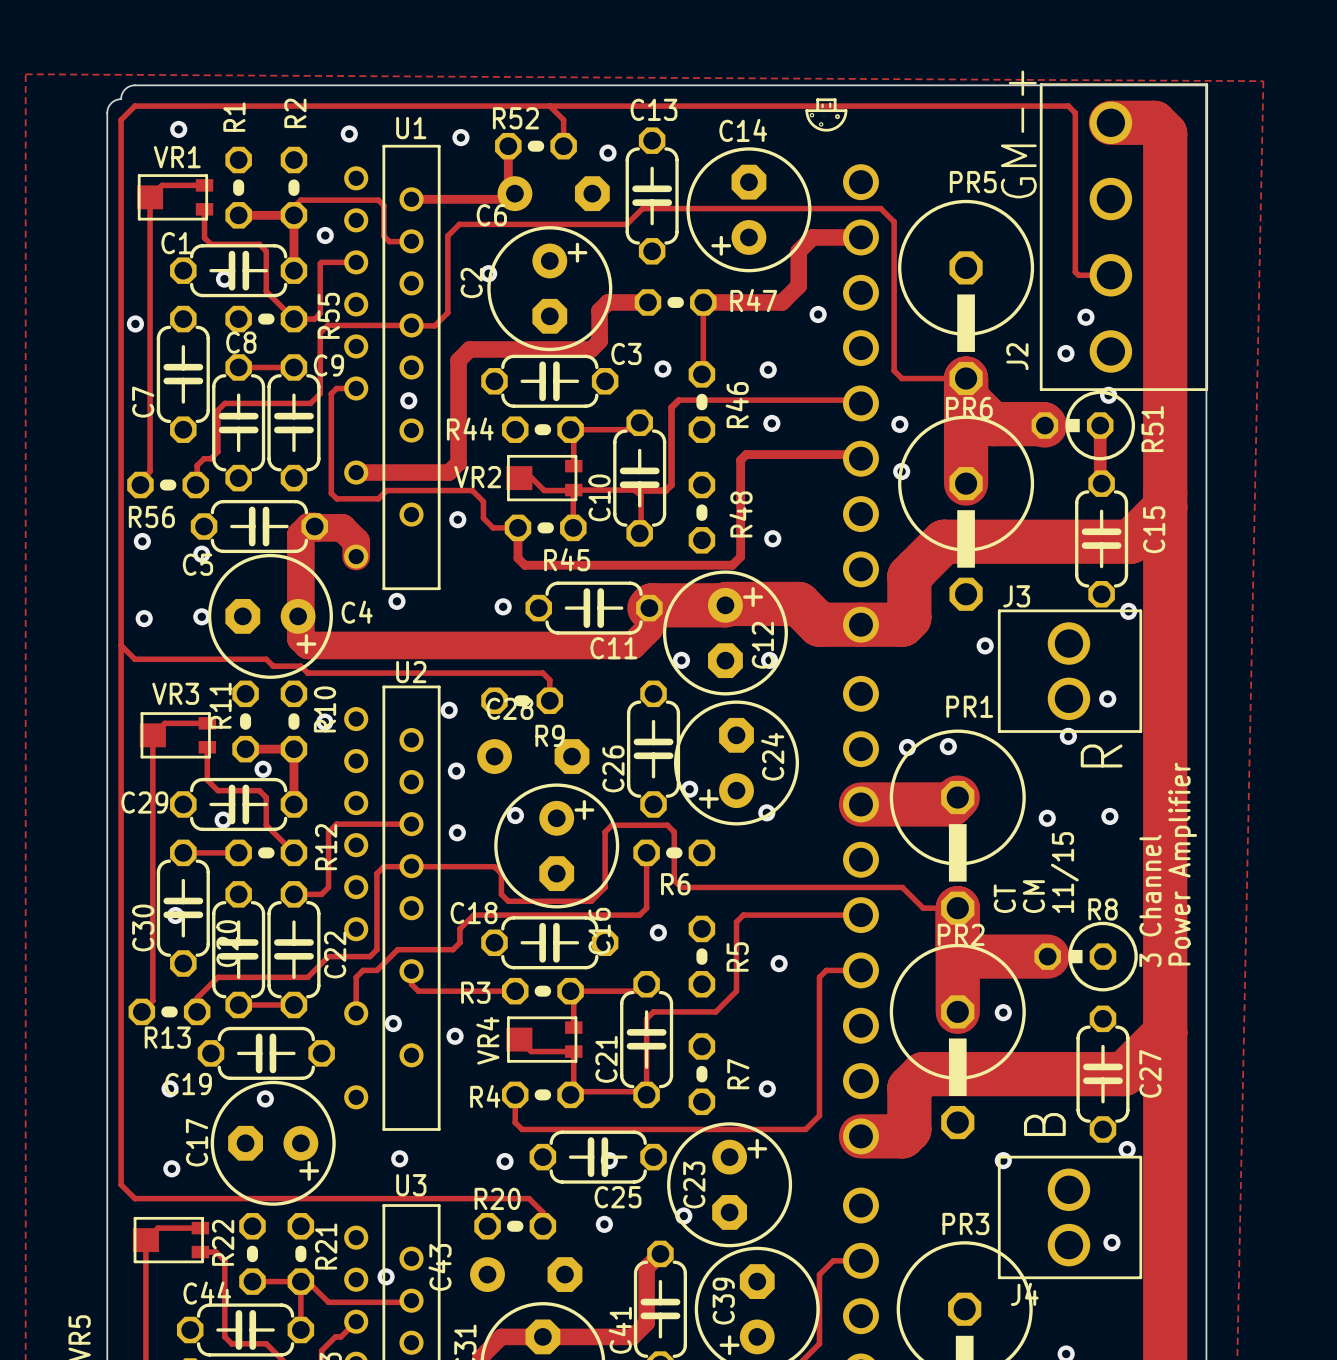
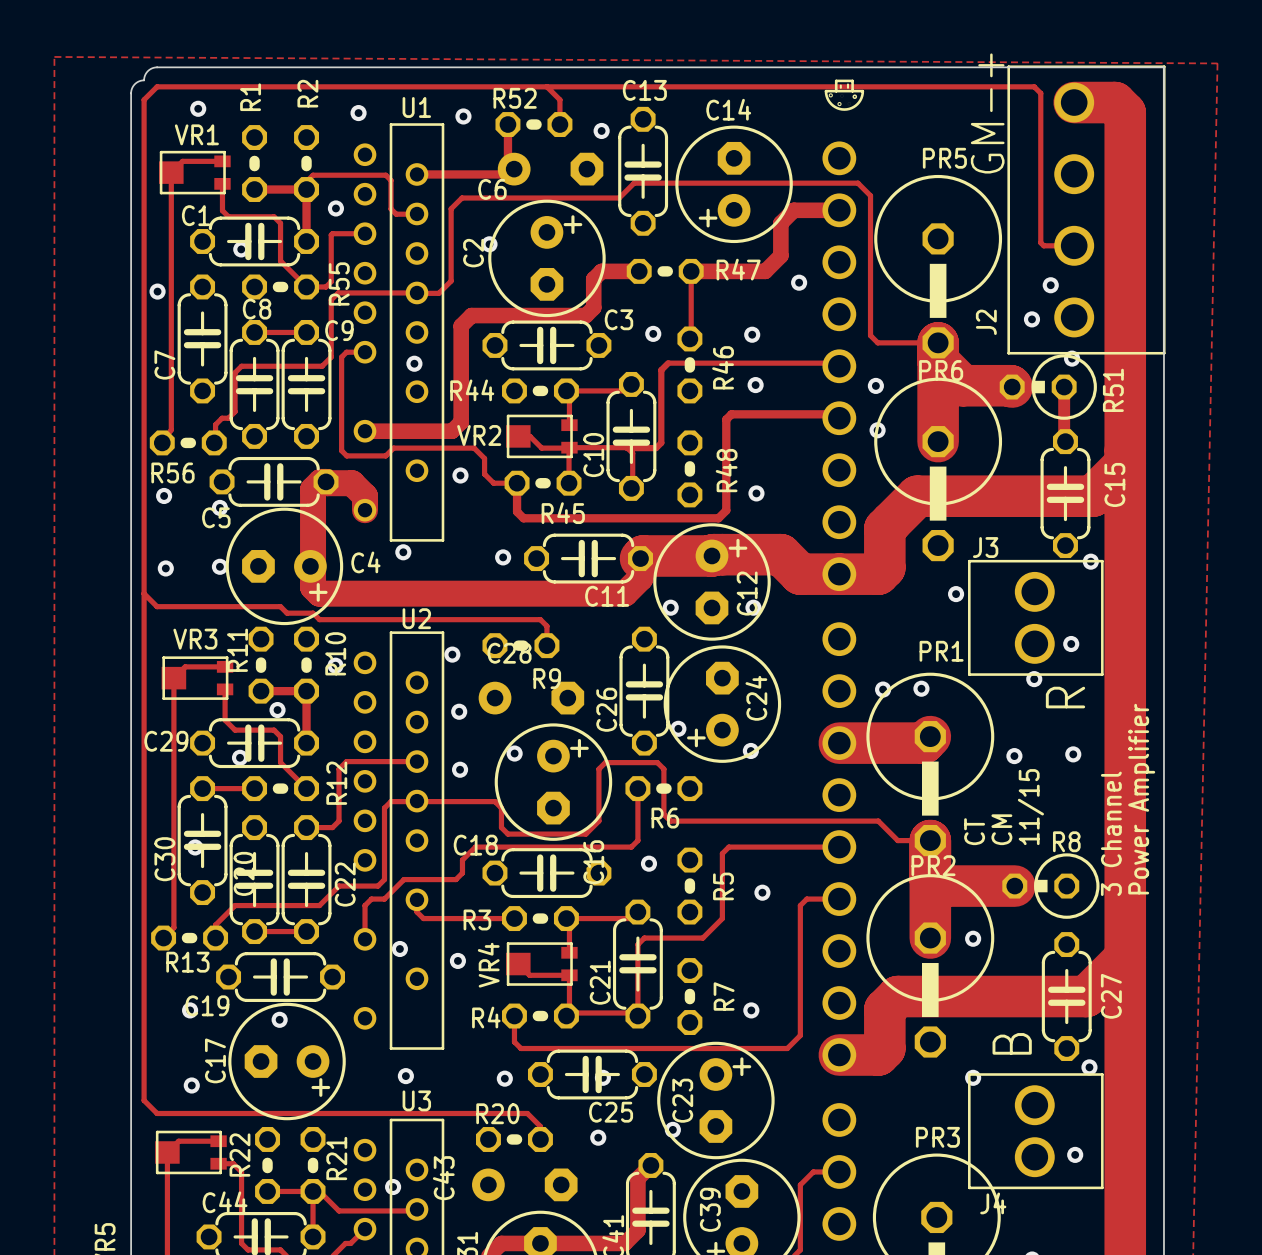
drawing position: (826, 115) -> (844, 95)

